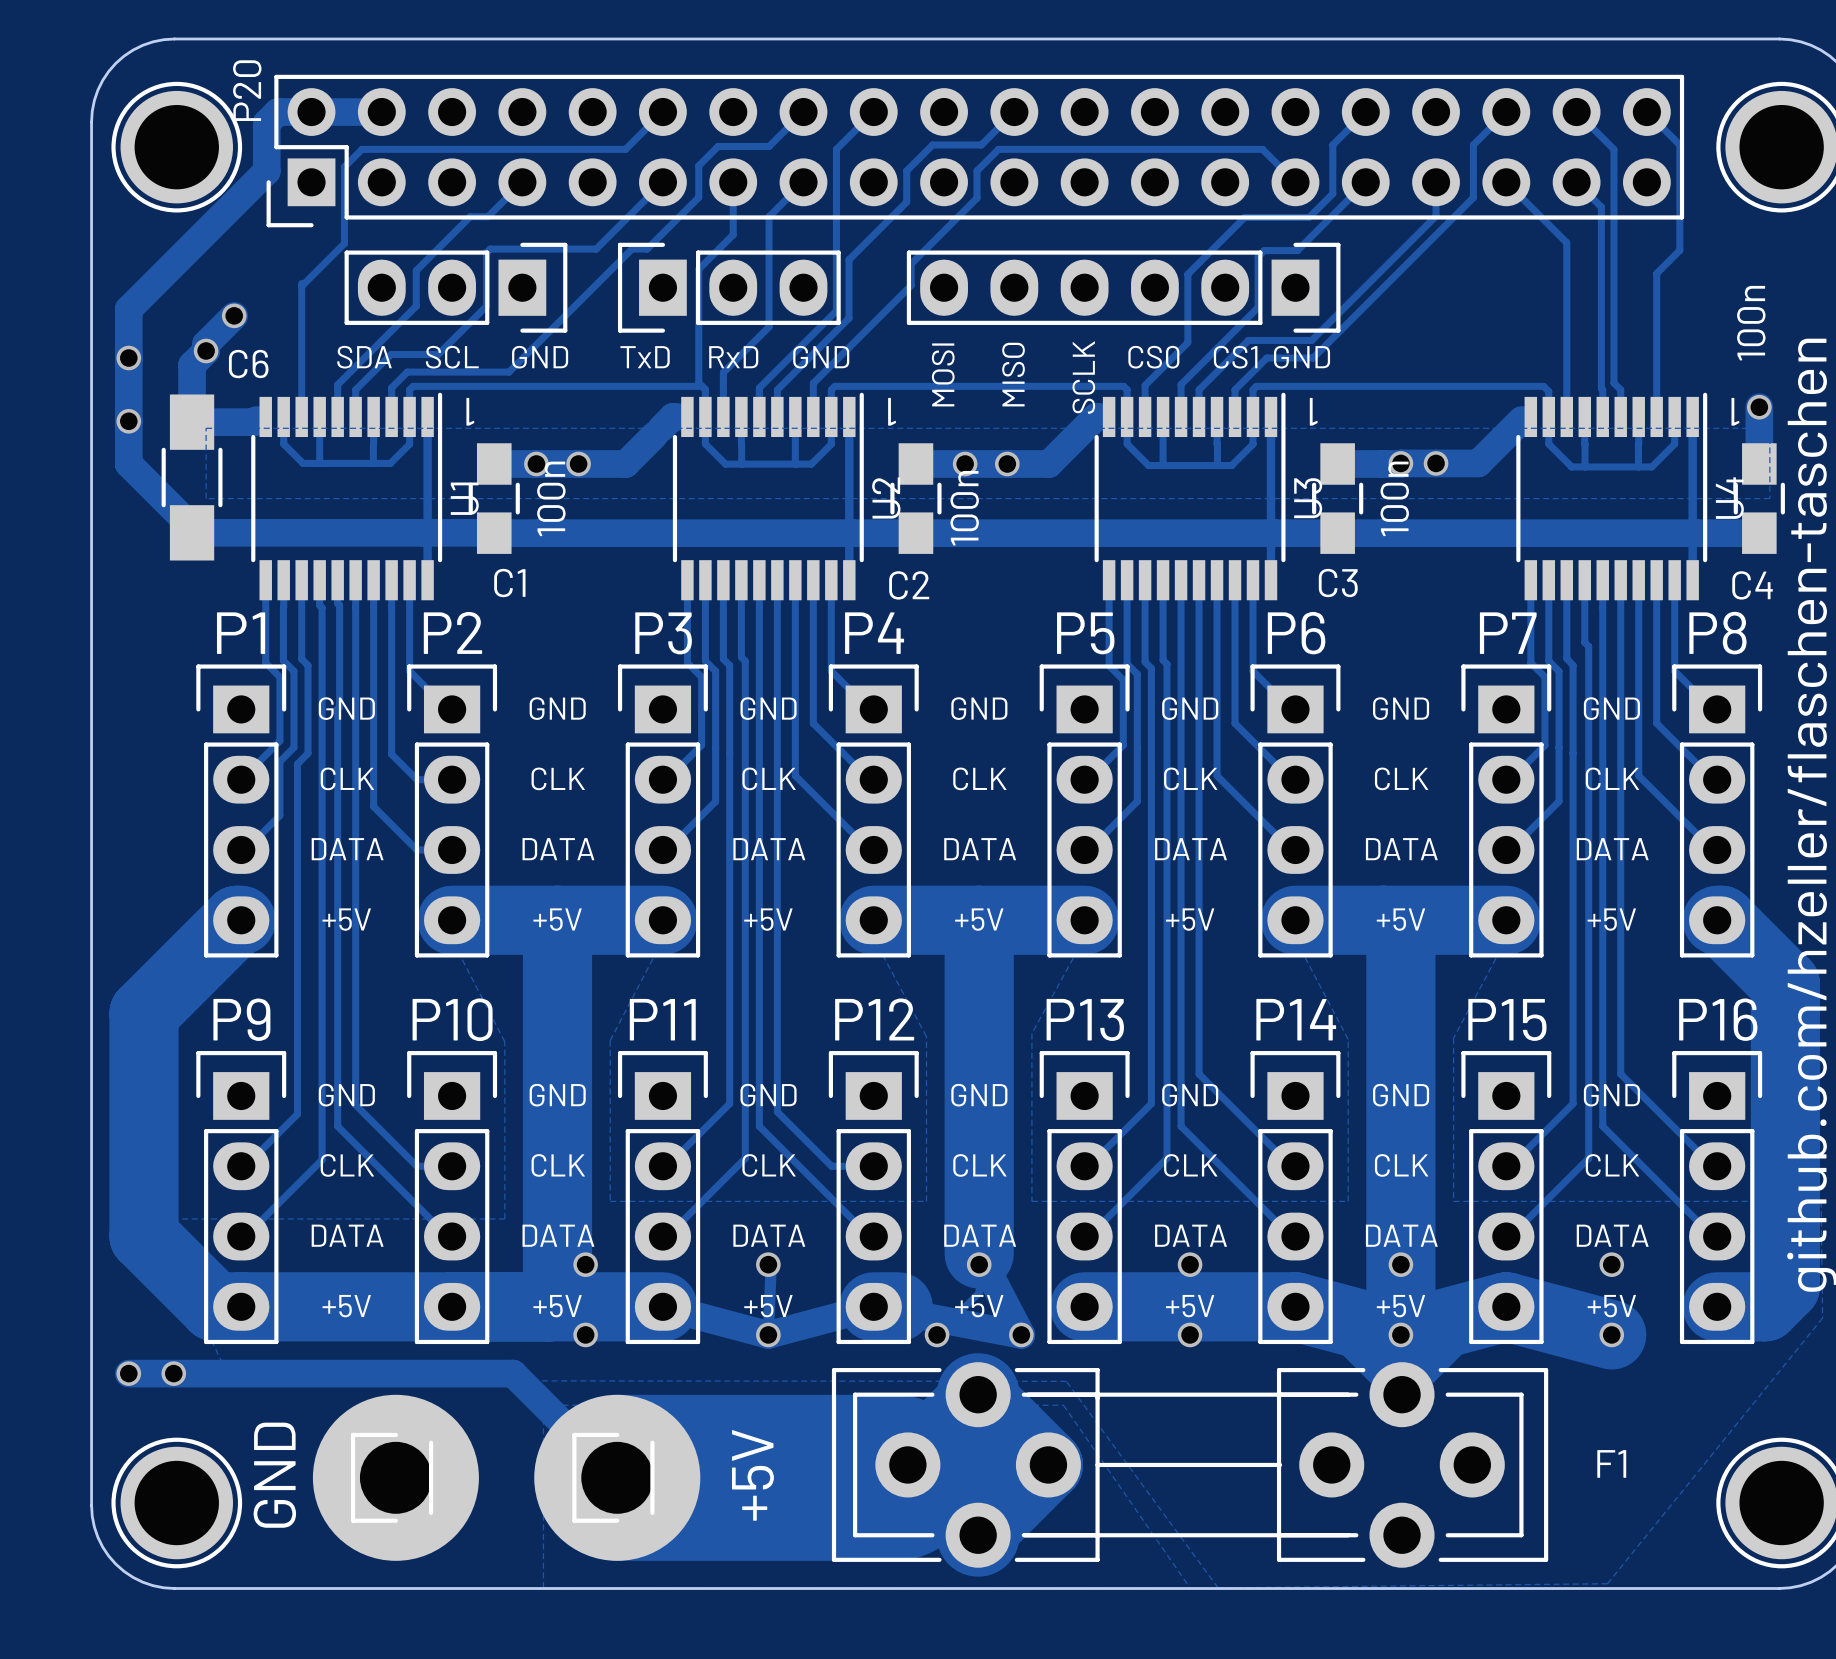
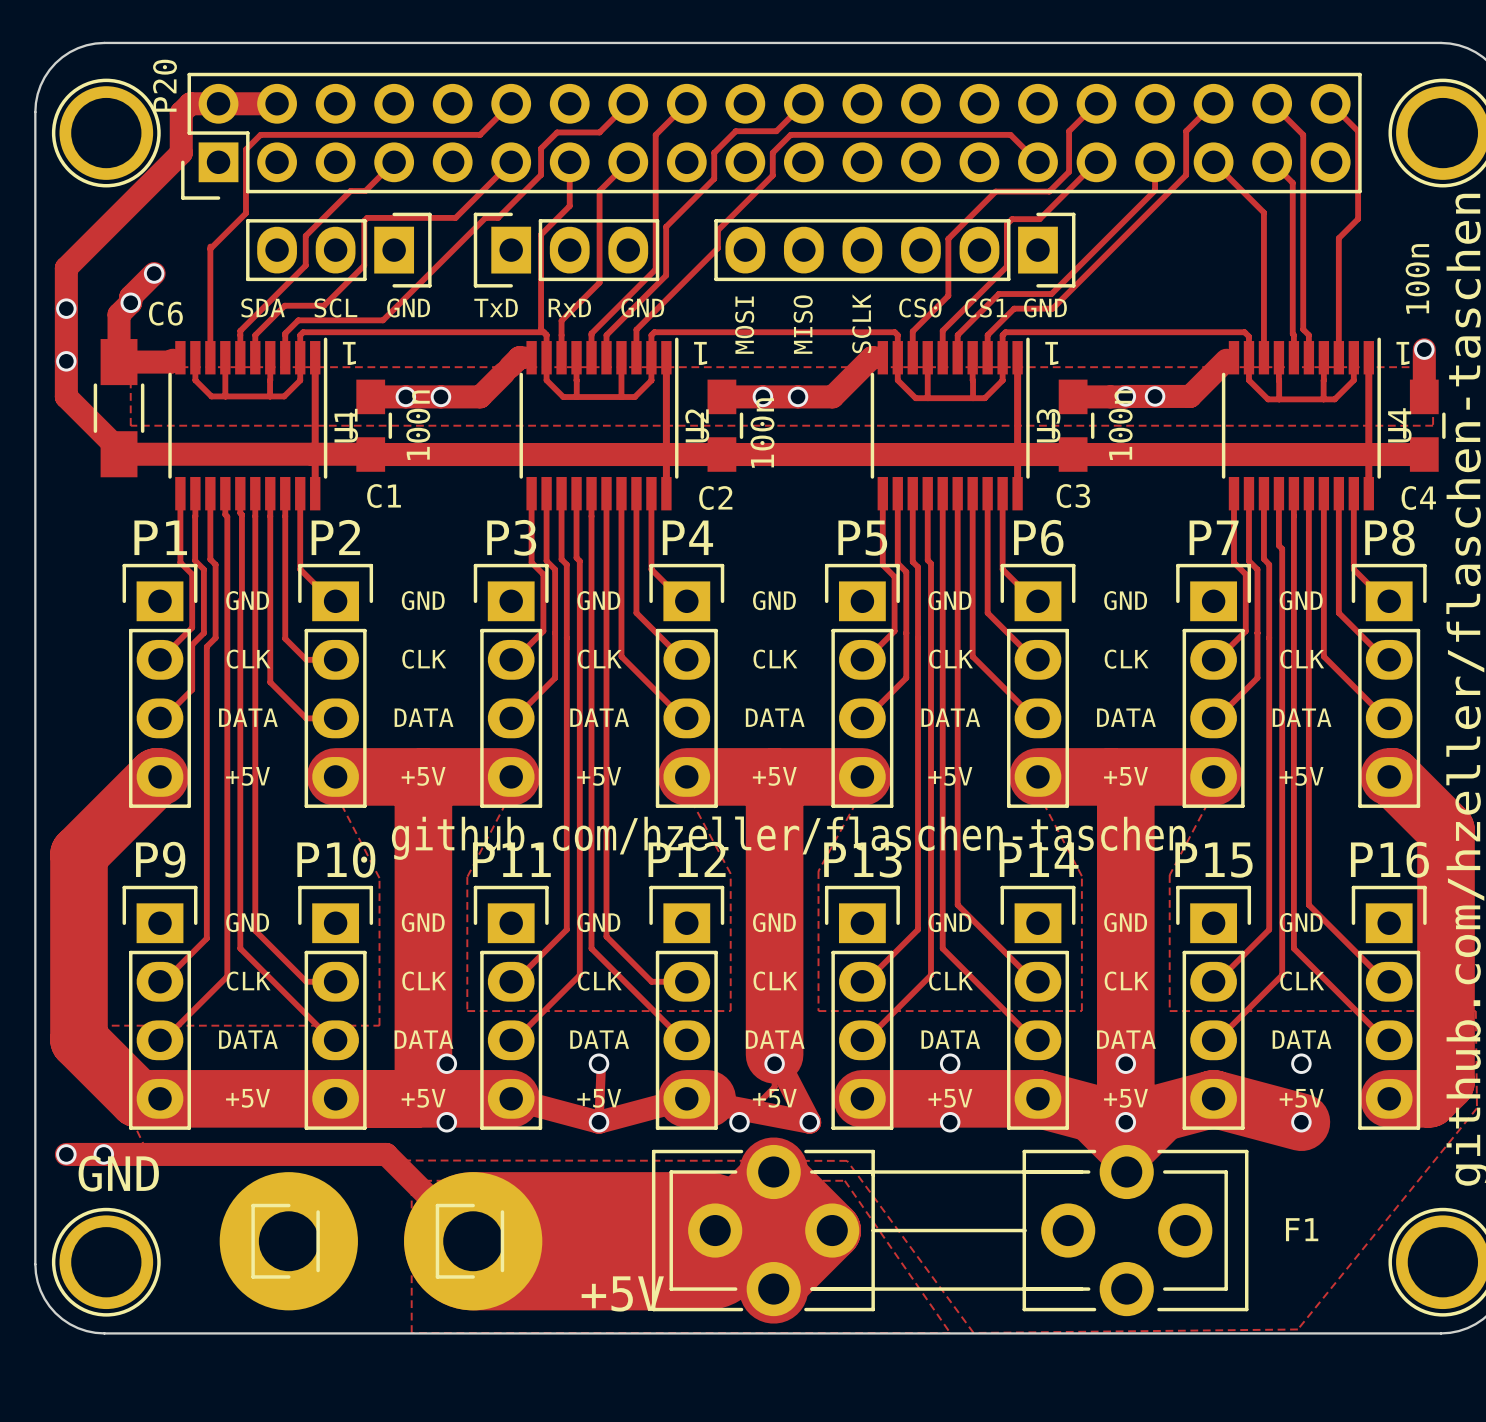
text: none -> github.com/hzeller/flaschen-taschen (788, 838)
text rotation: 0° (274, 1475) -> 90° clockwise (118, 1173)
text rotation: 0° (752, 1475) -> 90° clockwise (622, 1293)

